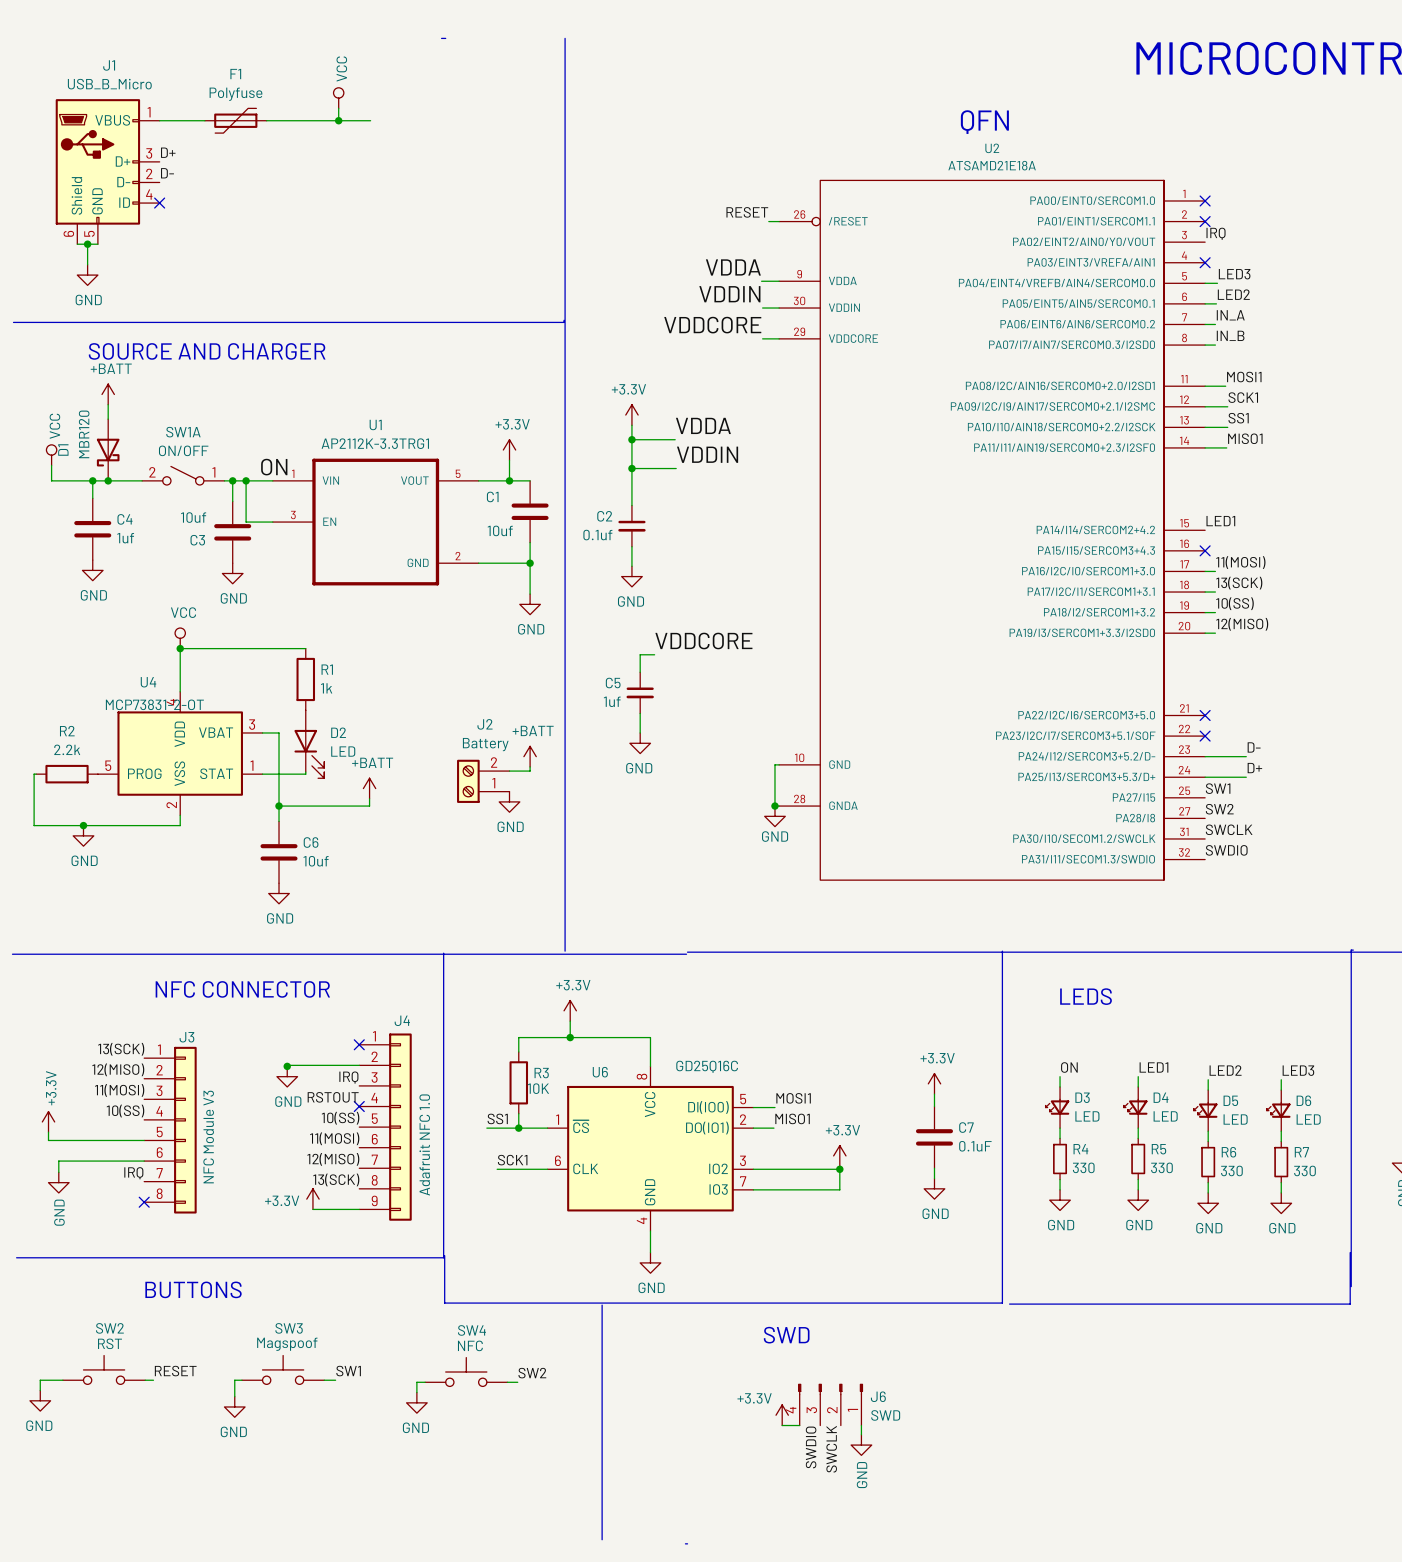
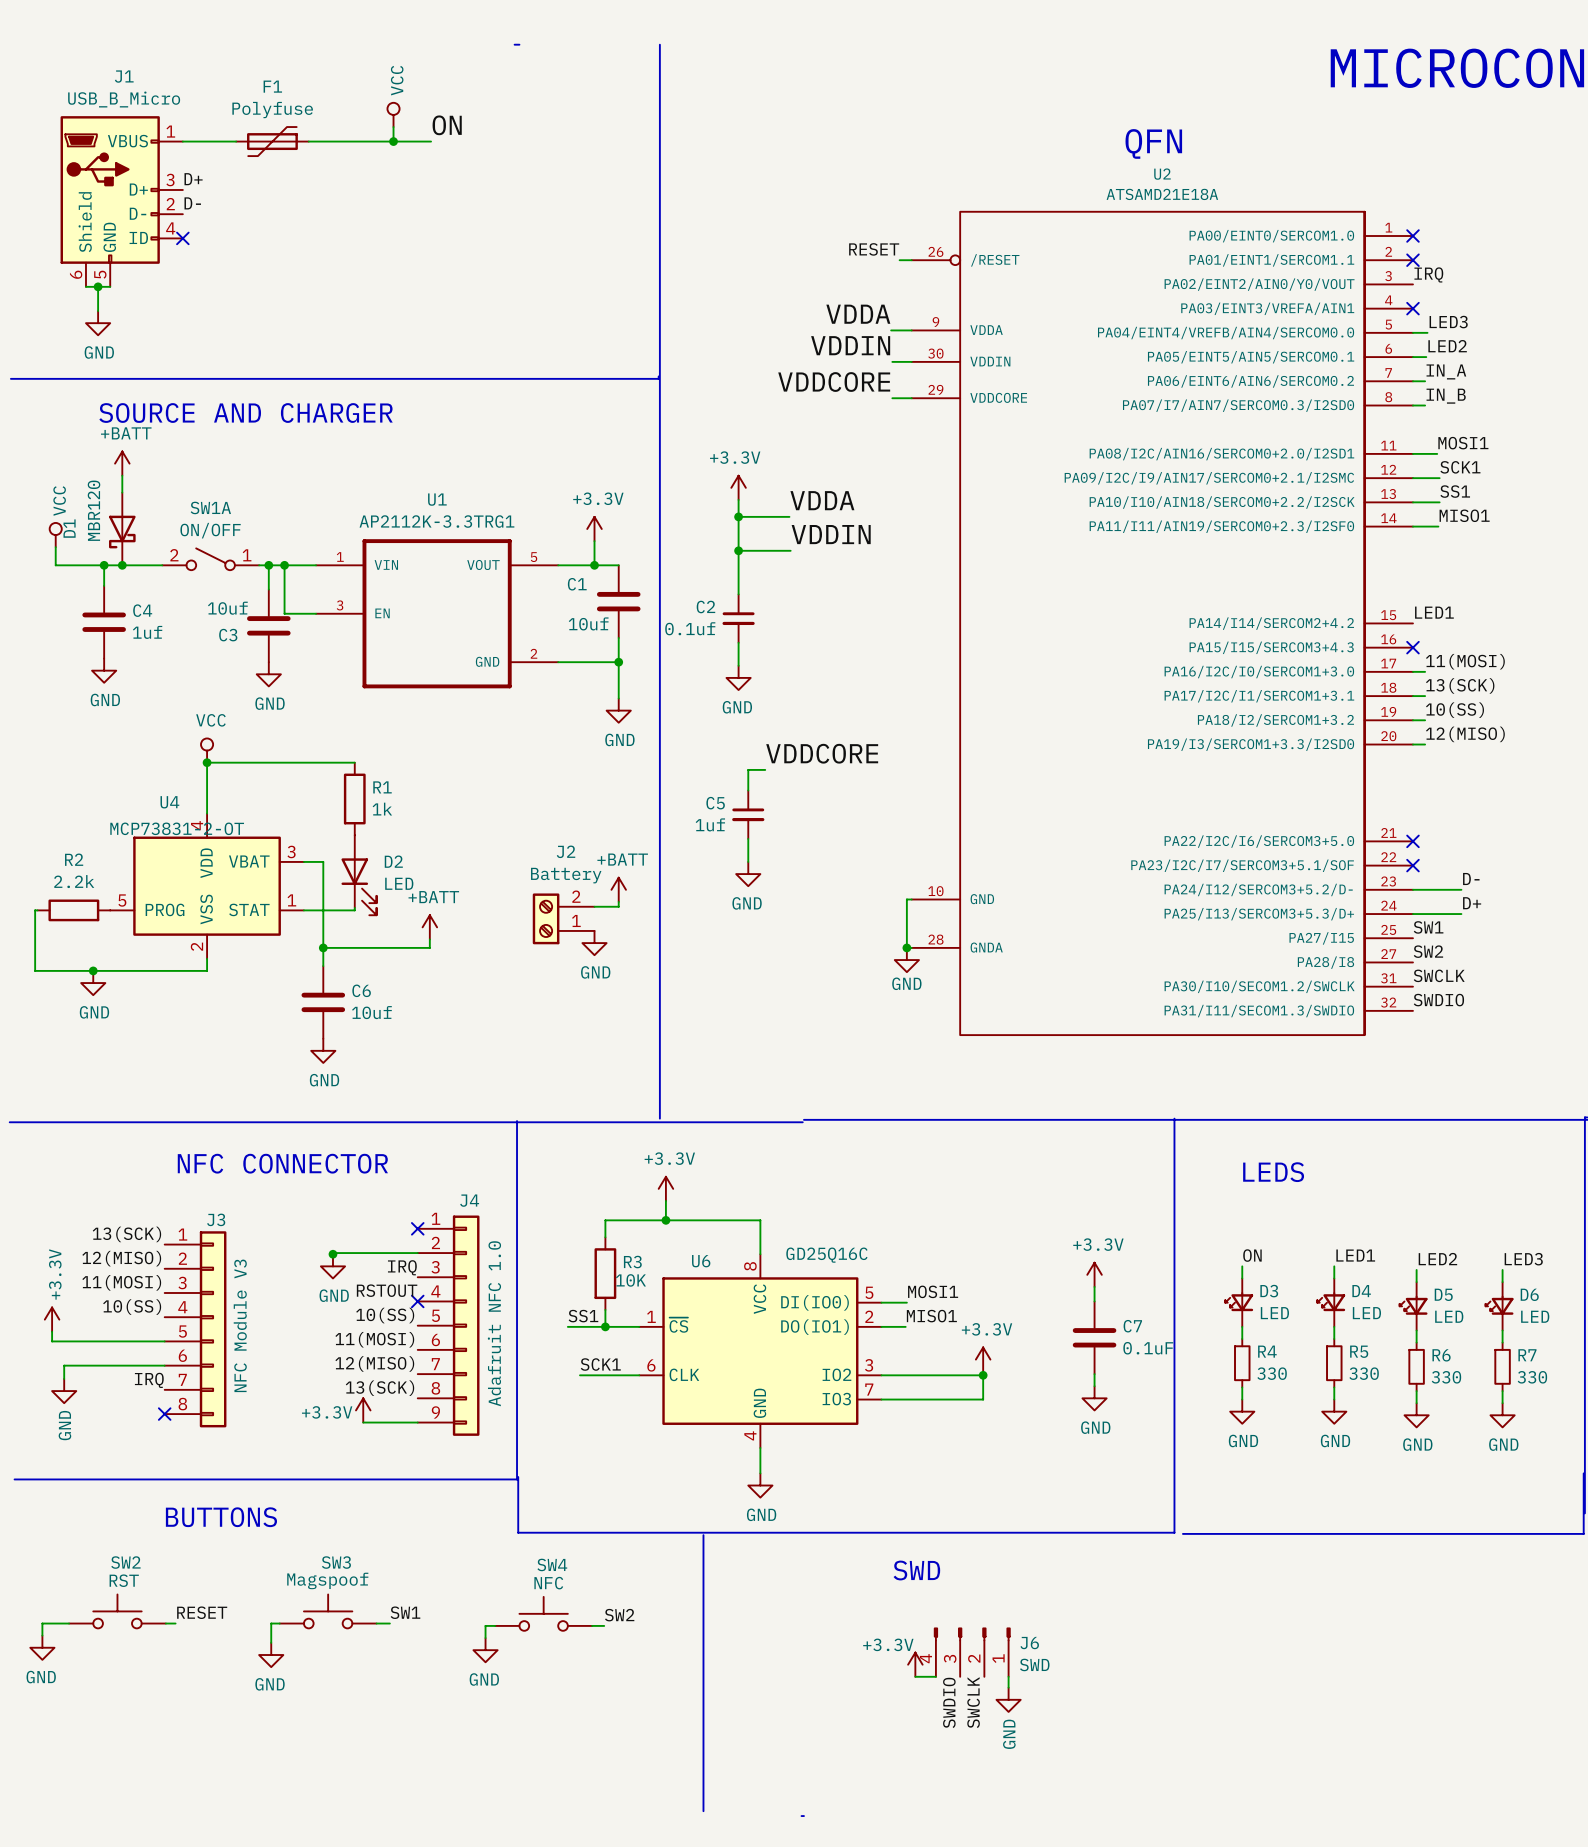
label: none -> ON (447, 125)
label: ON (274, 467) -> none

